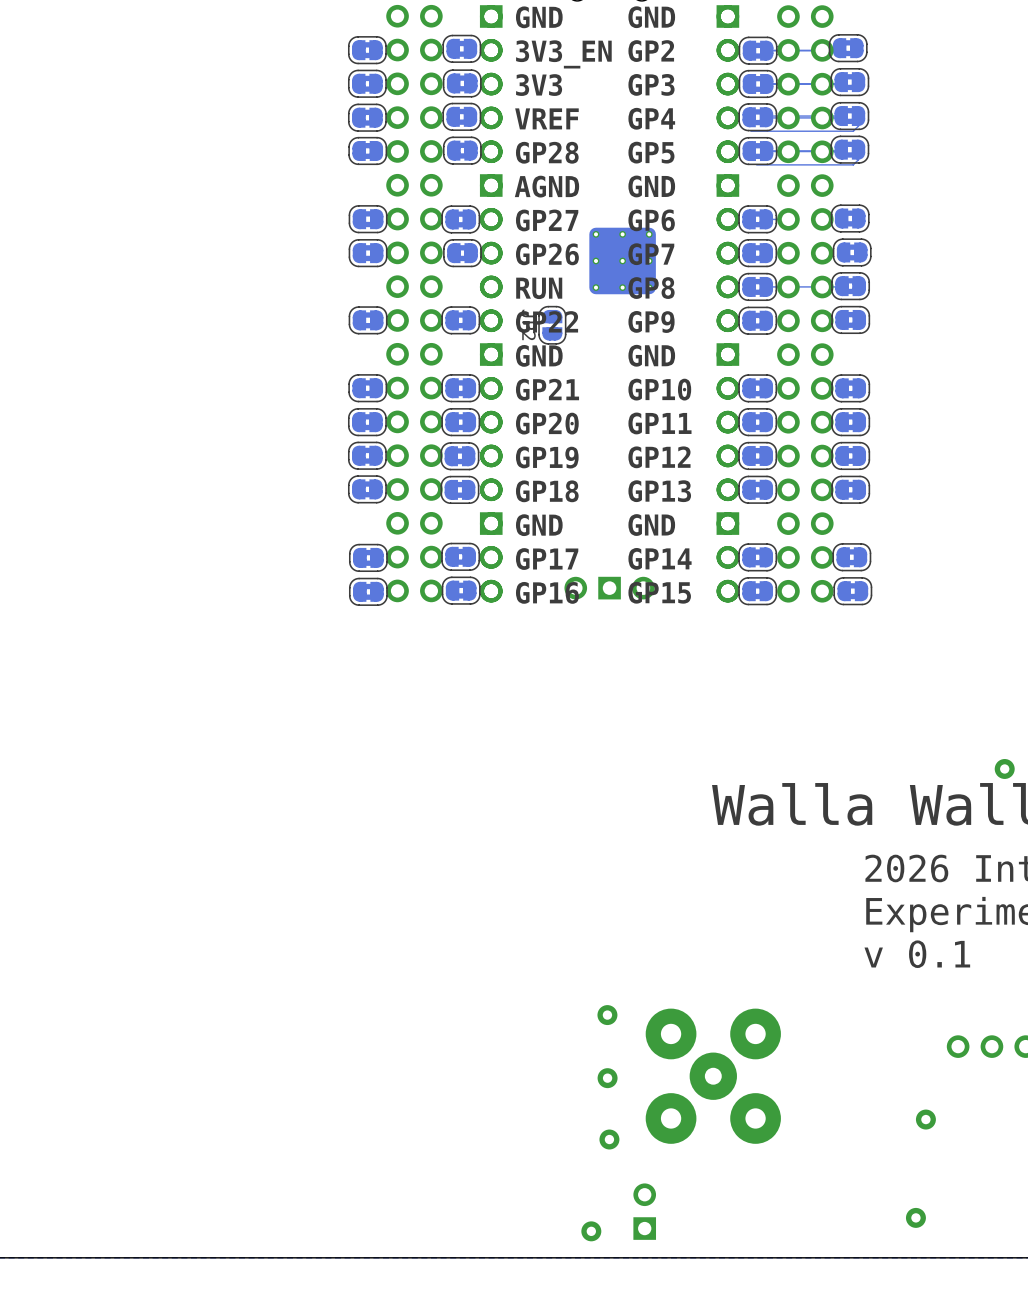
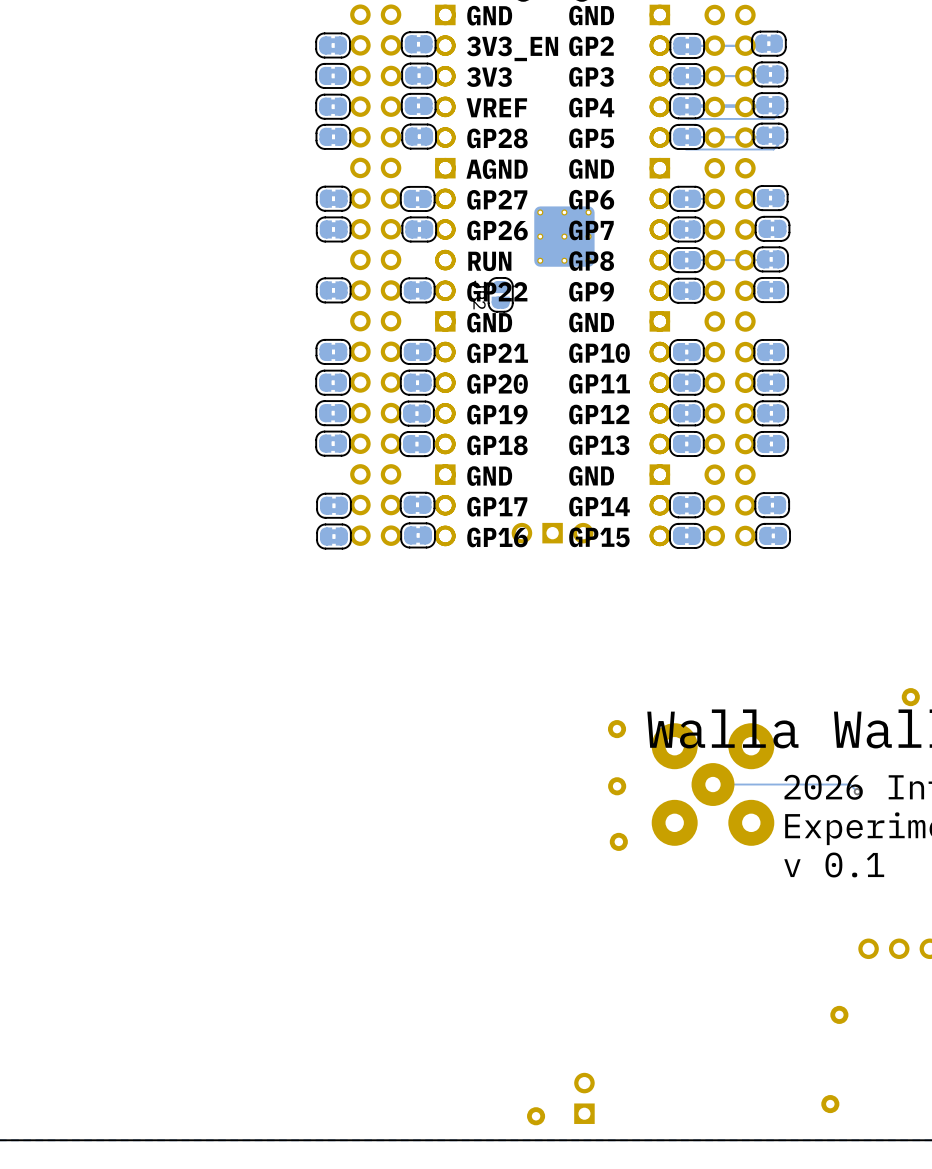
part: none -> (617, 729)
track: none -> (713, 784) (850, 784) (857, 791)
part: none -> (617, 786)
via: none -> (857, 791)
part: none -> (618, 841)
part: (607, 1015) -> none
part position: (713, 1076) -> (713, 784)
part: (607, 1078) -> none
part: (609, 1139) -> none

